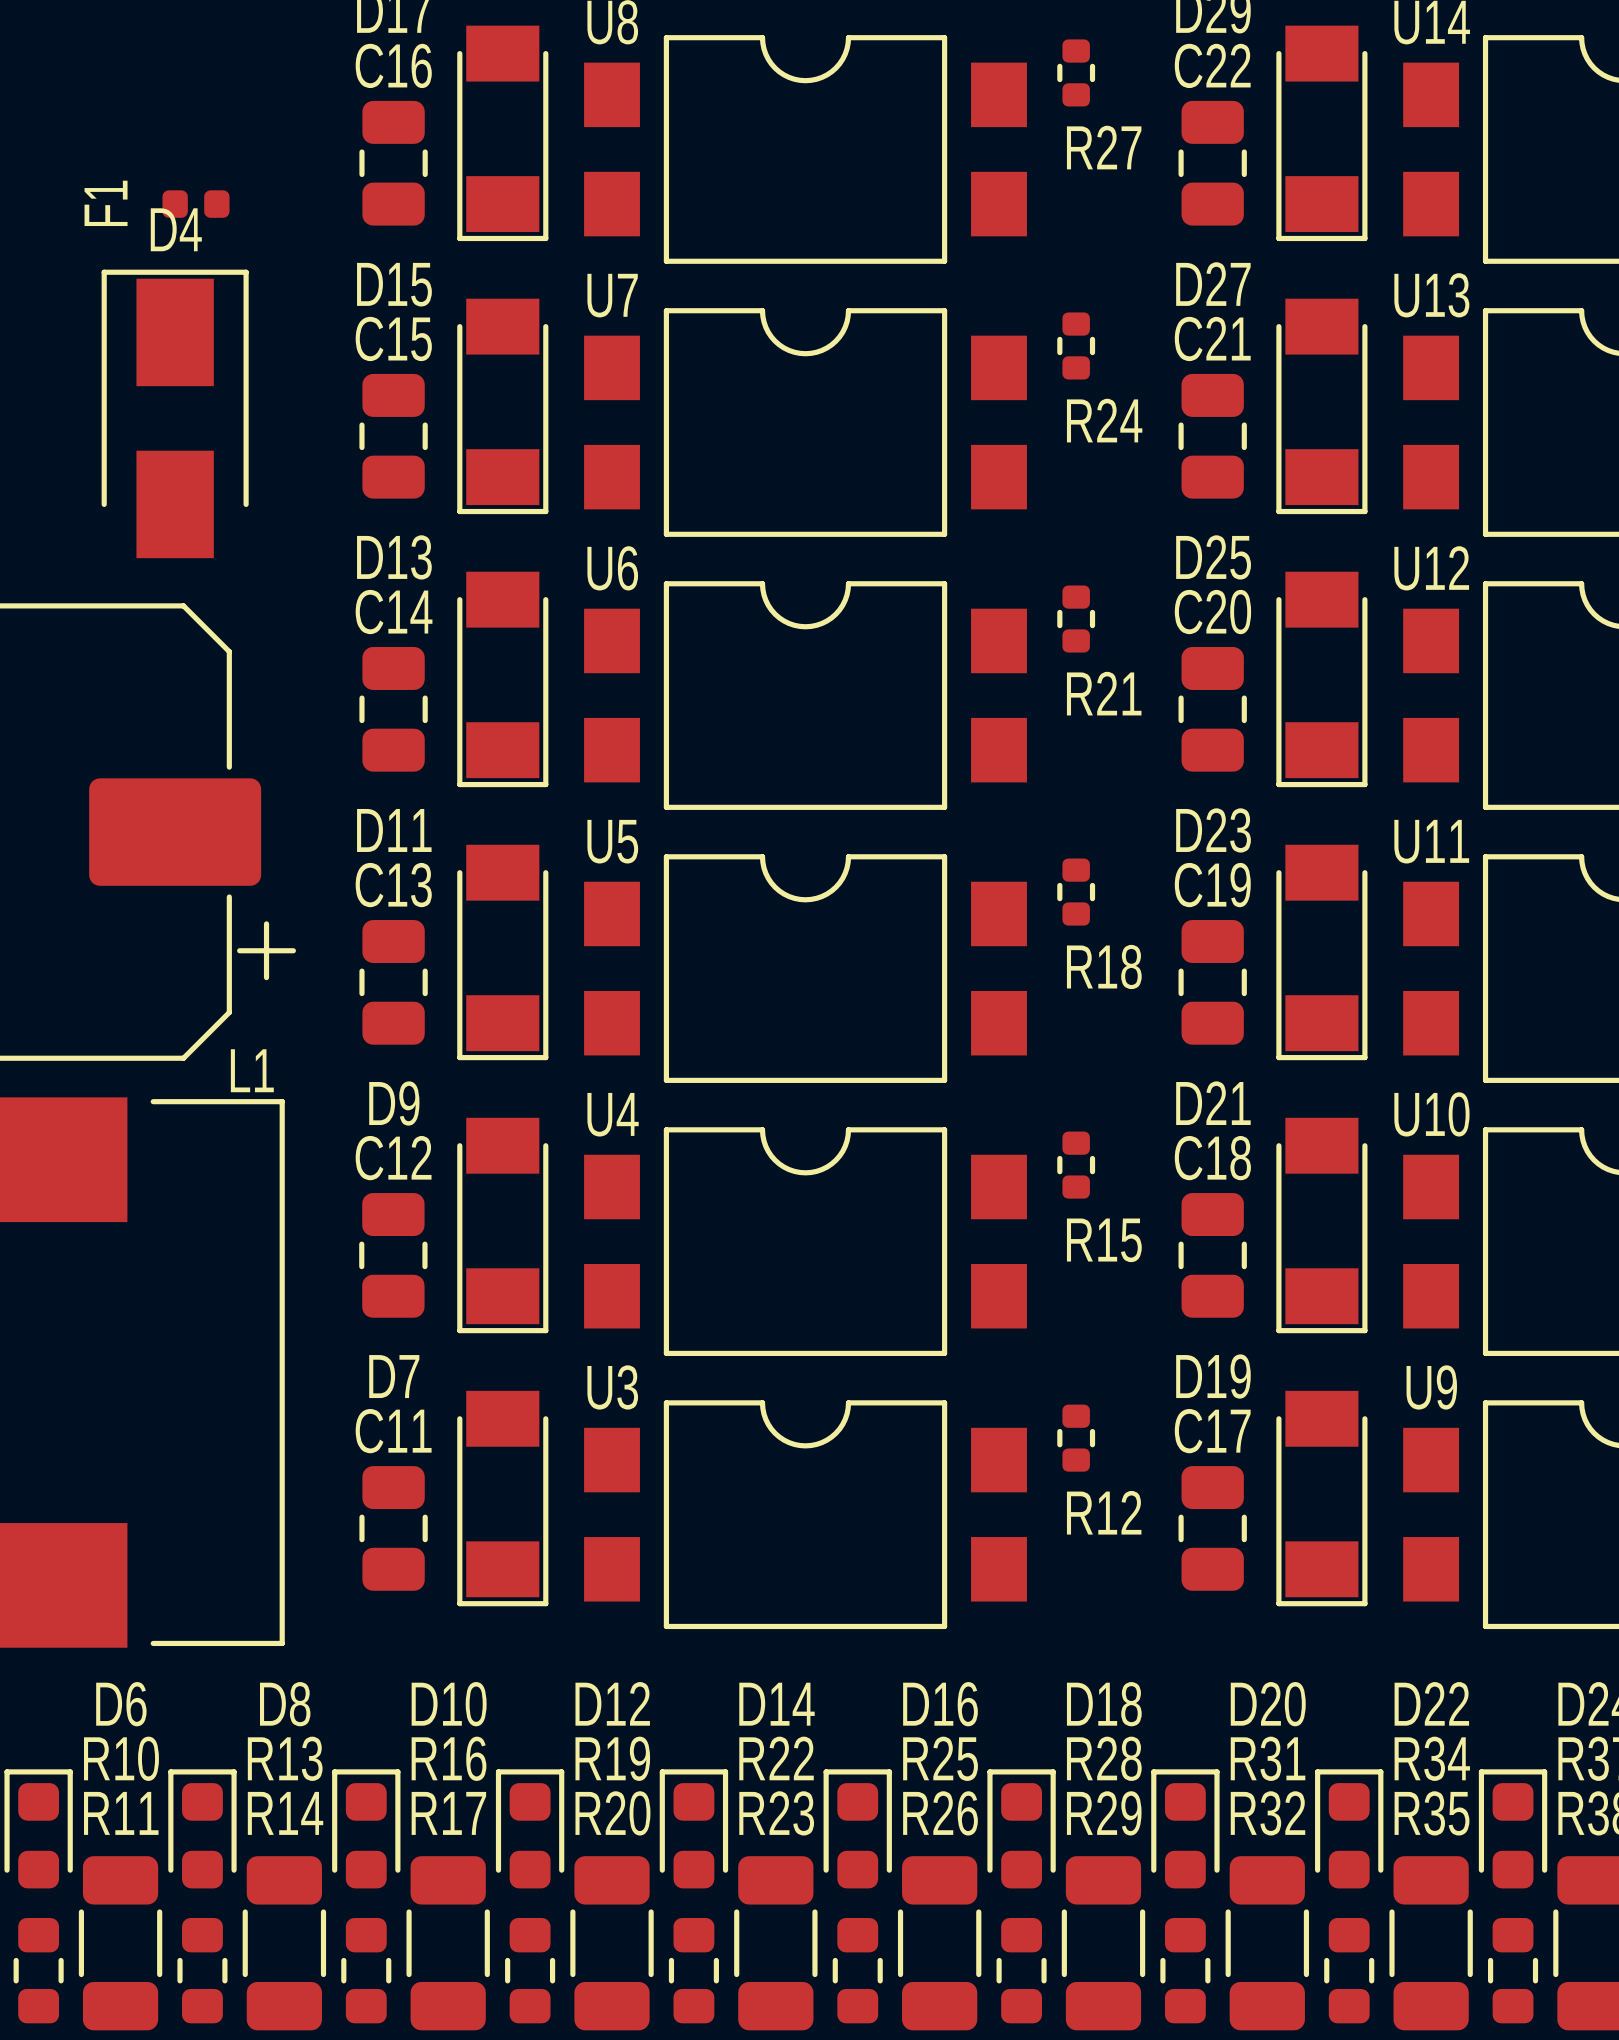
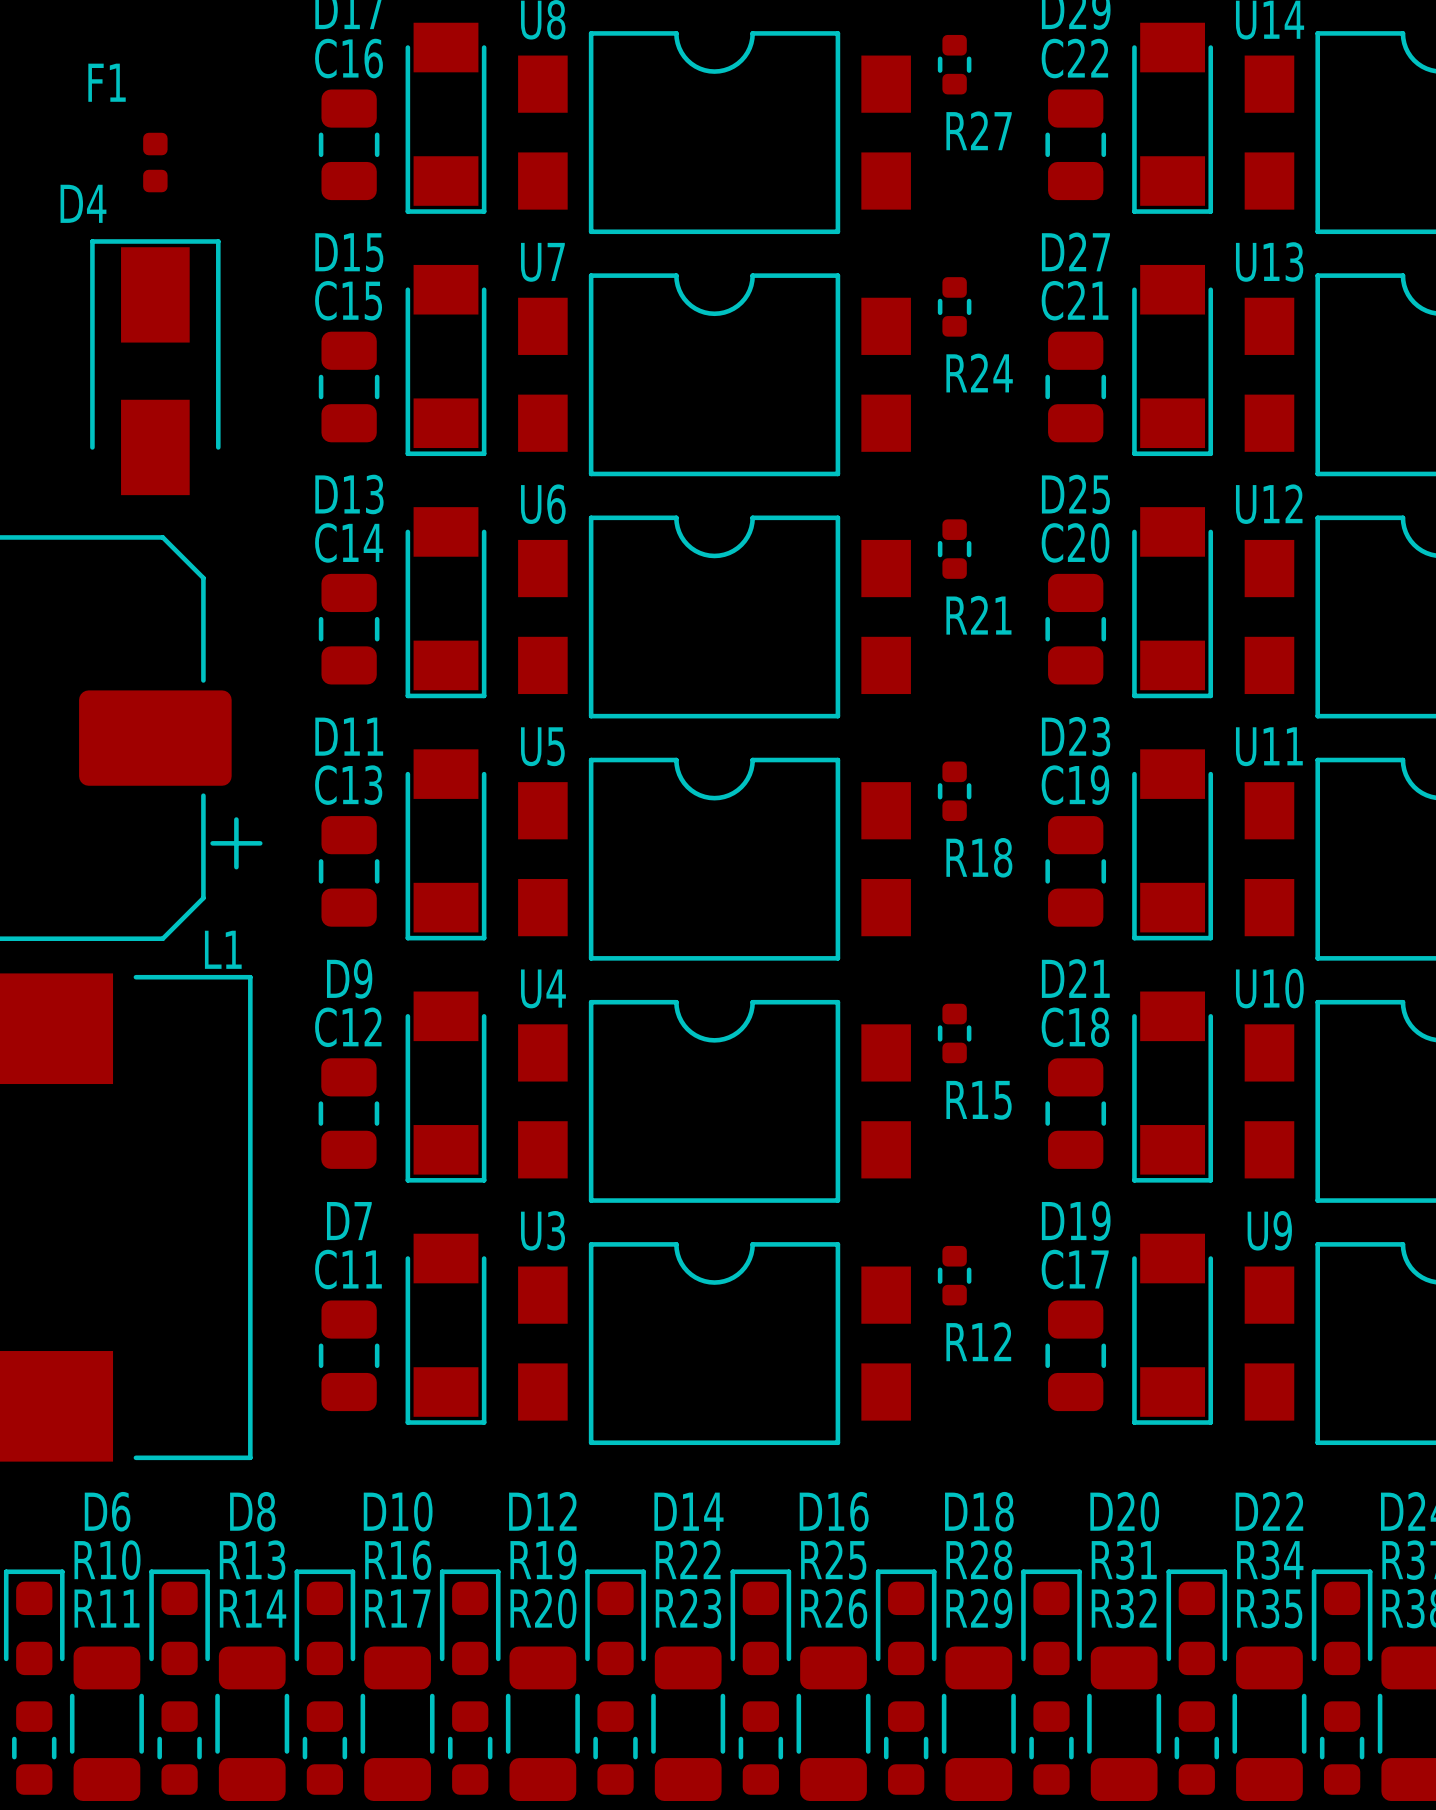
F1 rotation: 0° (196, 204) -> 90° clockwise (155, 162)
D4 name position: D4 (176, 229) -> D4 (83, 203)

